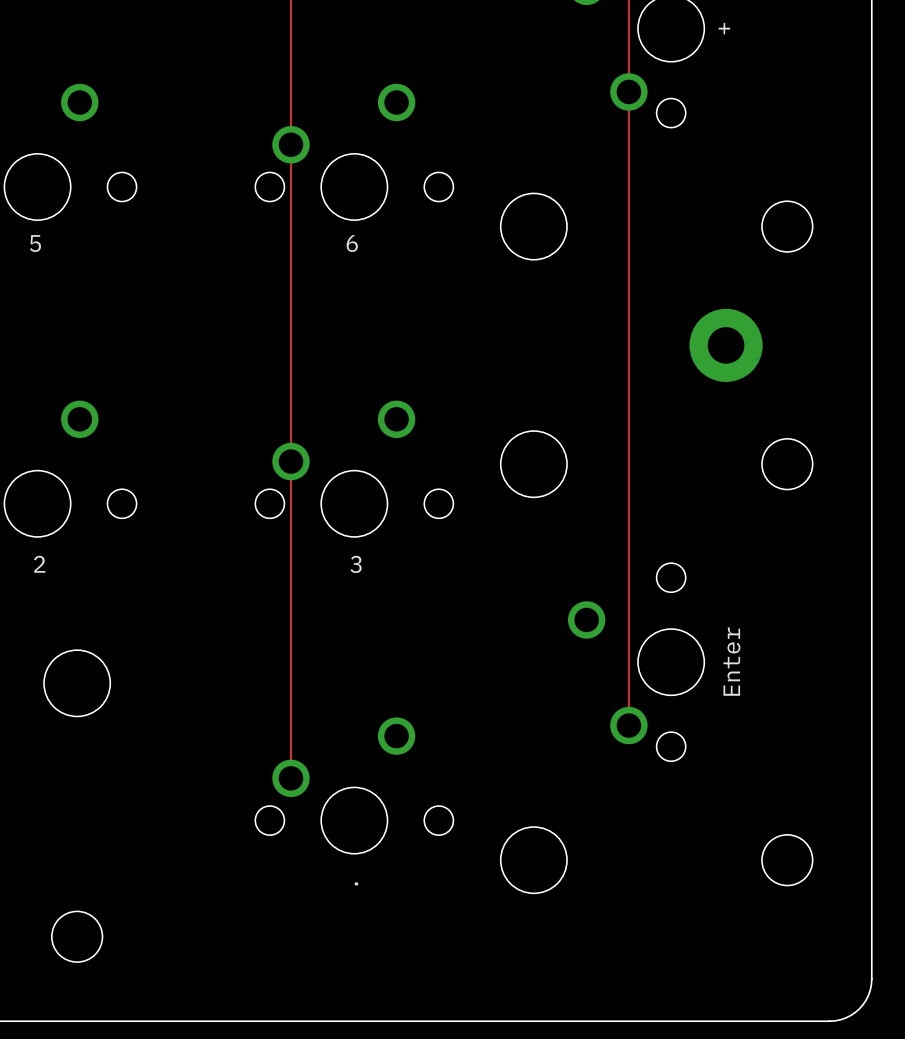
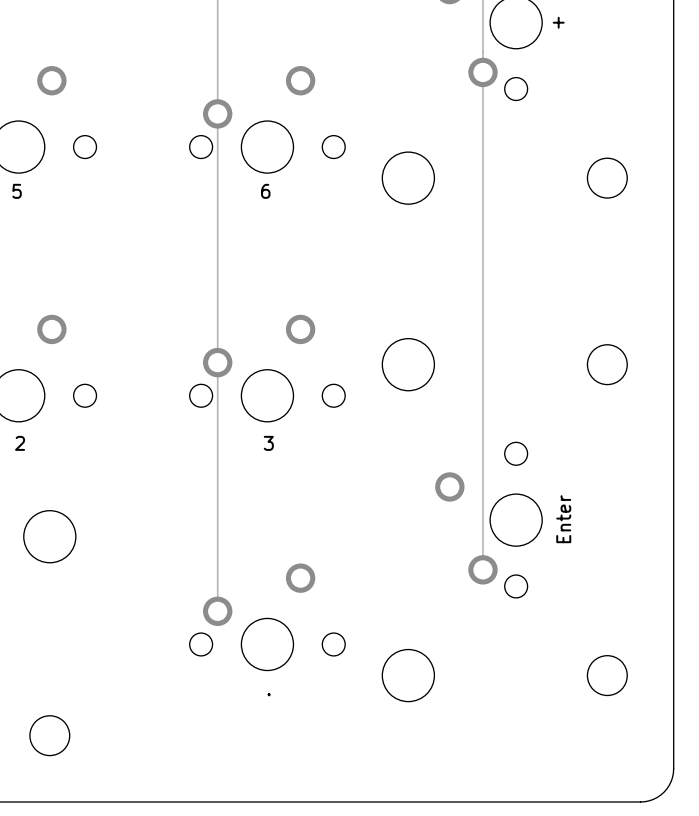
part: (726, 345) -> none

